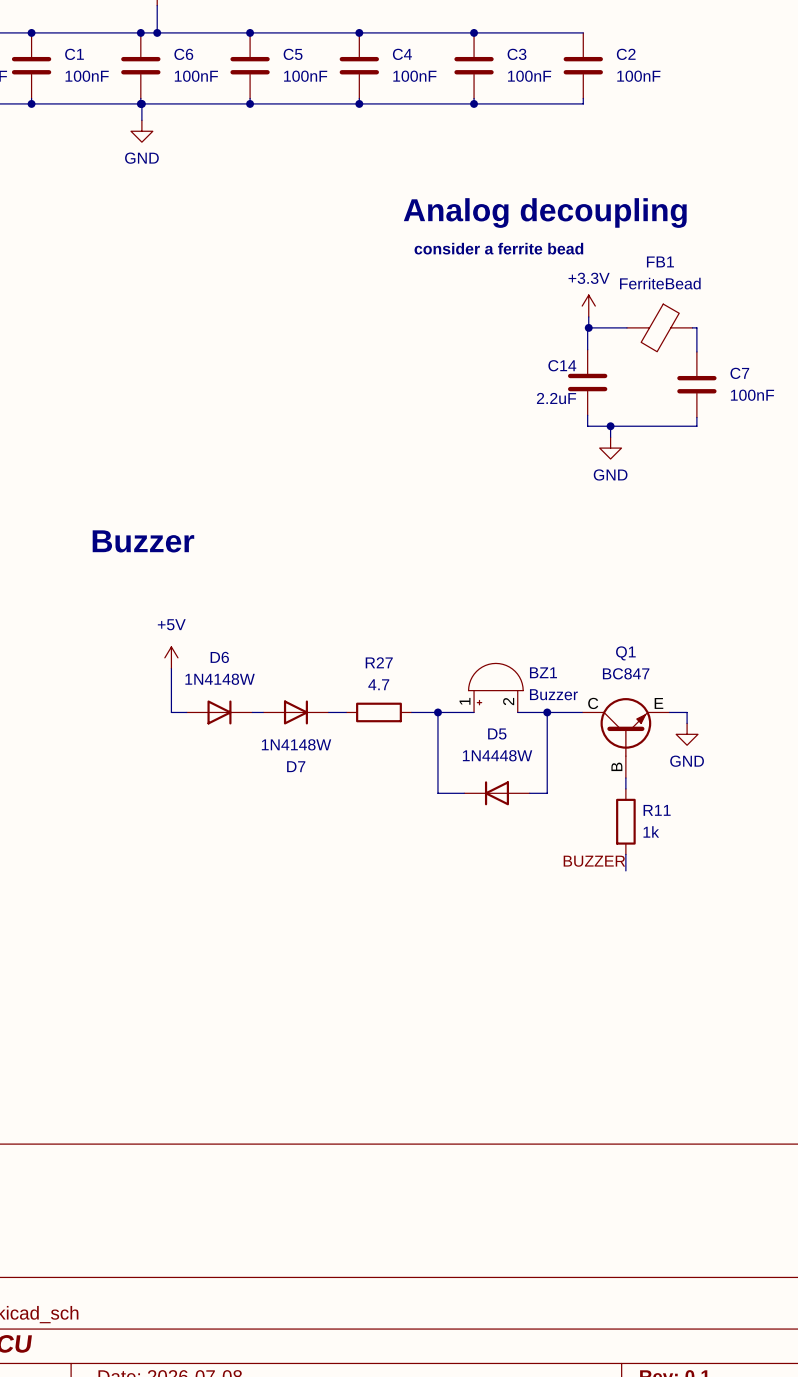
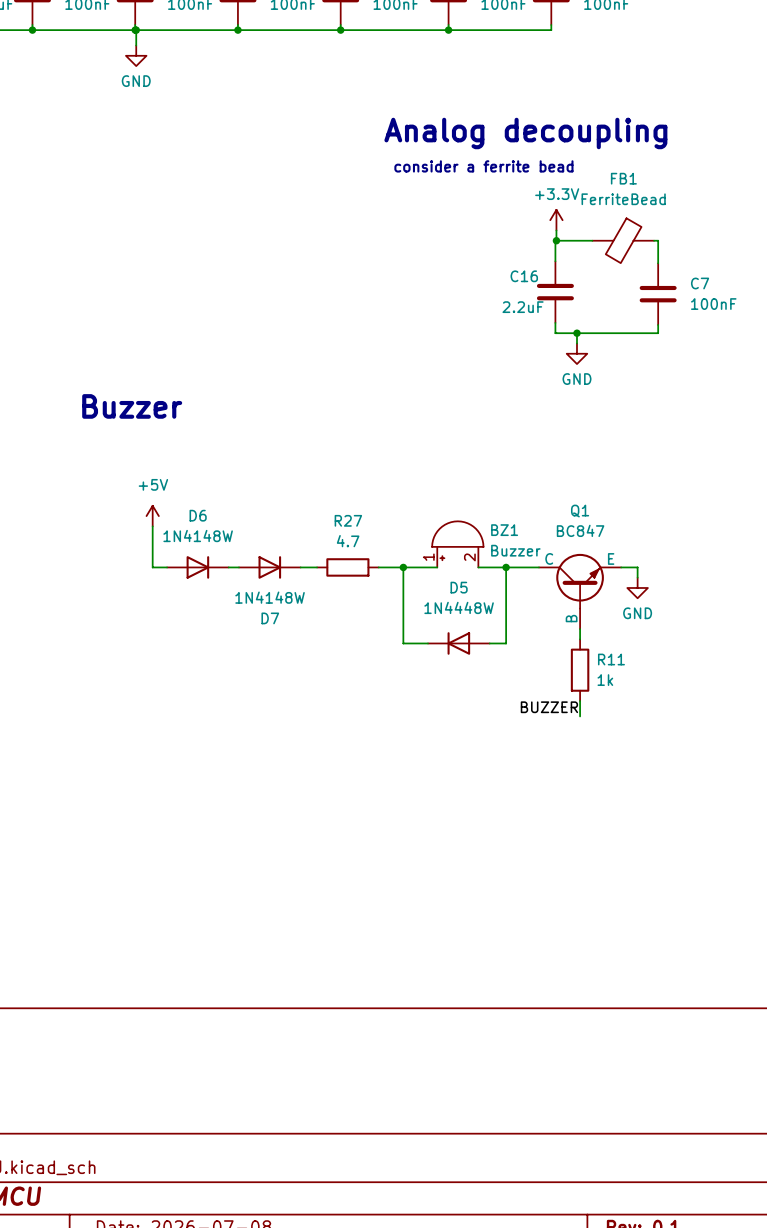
C14 name: C14 (562, 365) -> C16 (524, 276)
text position: Buzzer (143, 541) -> Buzzer (132, 406)
power symbol position: +5V (171, 657) -> +5V (152, 516)
wire: (171, 668) (171, 712) (186, 712) -> (152, 526) (152, 567) (167, 567)
BZ1 position: (495, 687) -> (457, 544)
D6 position: (219, 712) -> (197, 567)
wire: (252, 712) (263, 712) -> (228, 567) (238, 567)
D7 position: (295, 712) -> (269, 567)
wire: (328, 712) (346, 712) -> (300, 567) (317, 567)
R27 position: (378, 712) -> (347, 567)
wire: (411, 712) (474, 712) -> (378, 567) (437, 567)
wire: (437, 712) (437, 793) (464, 793) -> (403, 567) (403, 643) (428, 643)
junction position: (437, 712) -> (403, 567)
wire: (517, 712) (582, 712) -> (478, 567) (538, 567)
wire: (547, 712) (547, 793) (529, 793) -> (506, 567) (506, 643) (489, 643)
junction position: (547, 712) -> (506, 567)
wire: (669, 712) (687, 712) (687, 723) -> (621, 567) (637, 567) (637, 577)
power symbol position: GND (687, 734) -> GND (637, 587)
Q1 position: (625, 738) -> (580, 591)
wire: (625, 778) (625, 788) -> (580, 629) (580, 639)
D5 position: (496, 793) -> (458, 643)
R11 position: (625, 821) -> (580, 670)
wire: (625, 854) (625, 870) -> (580, 701) (580, 716)
label position: BUZZER (594, 861) -> BUZZER (549, 707)

